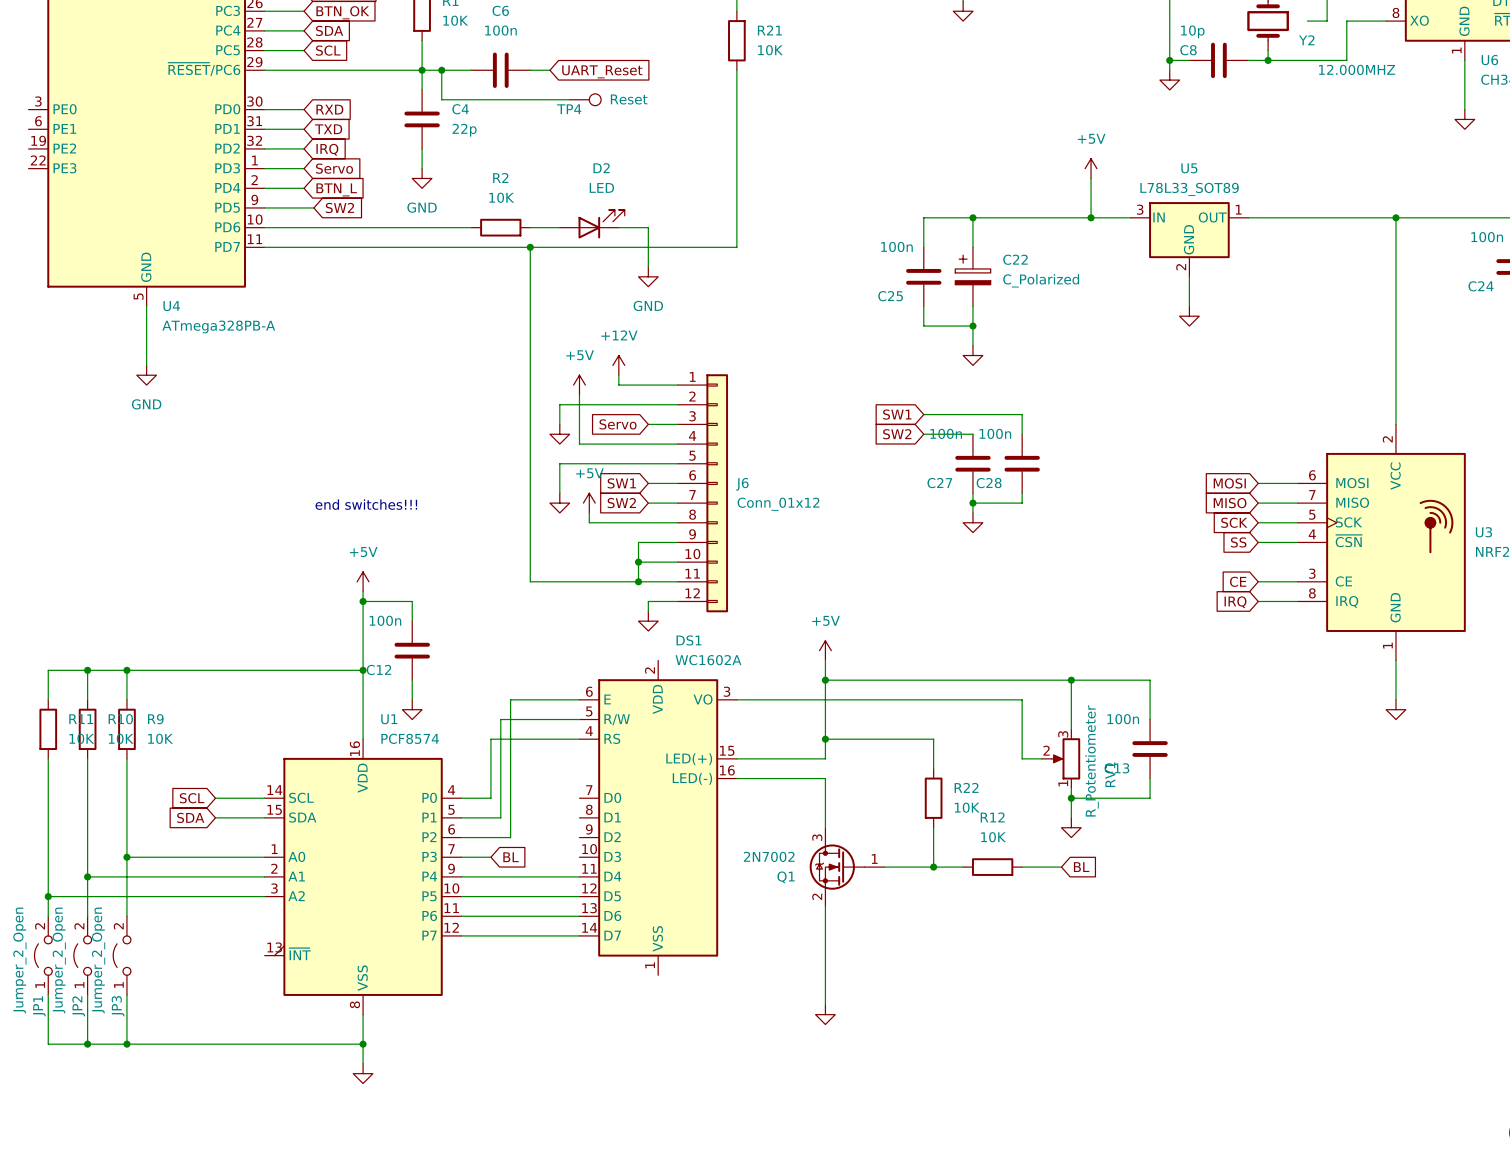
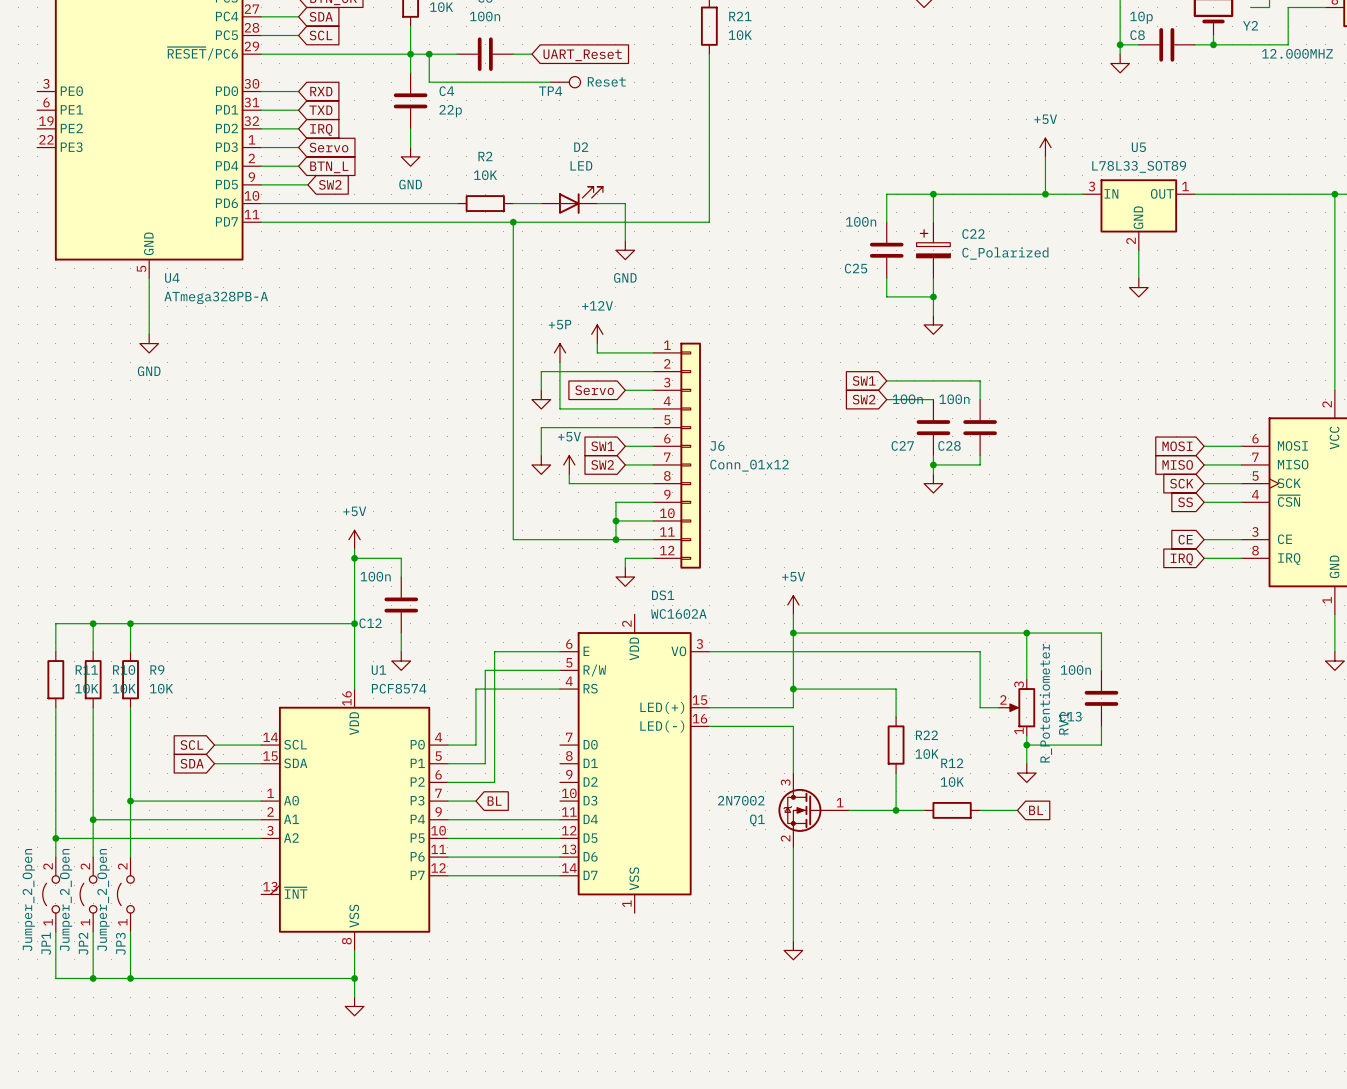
power symbol: +5V (579, 385) -> +5P (559, 352)
text: end switches!!! (366, 504) -> none

